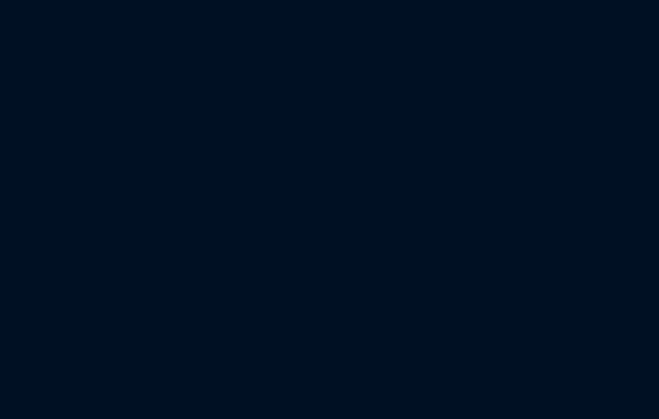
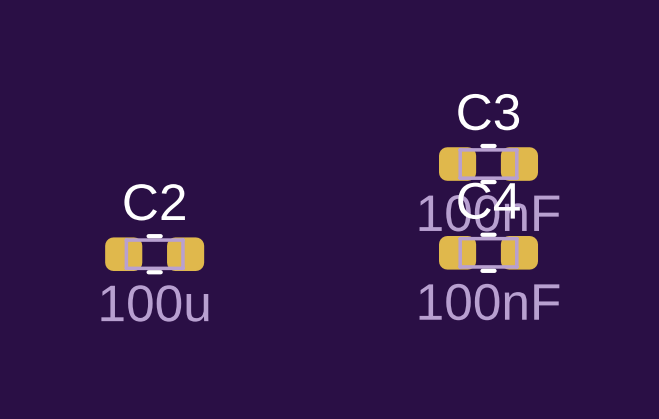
C3: none -> 100nF (488, 164)
C4: none -> 100nF (488, 252)
C2: none -> 100u (154, 254)

